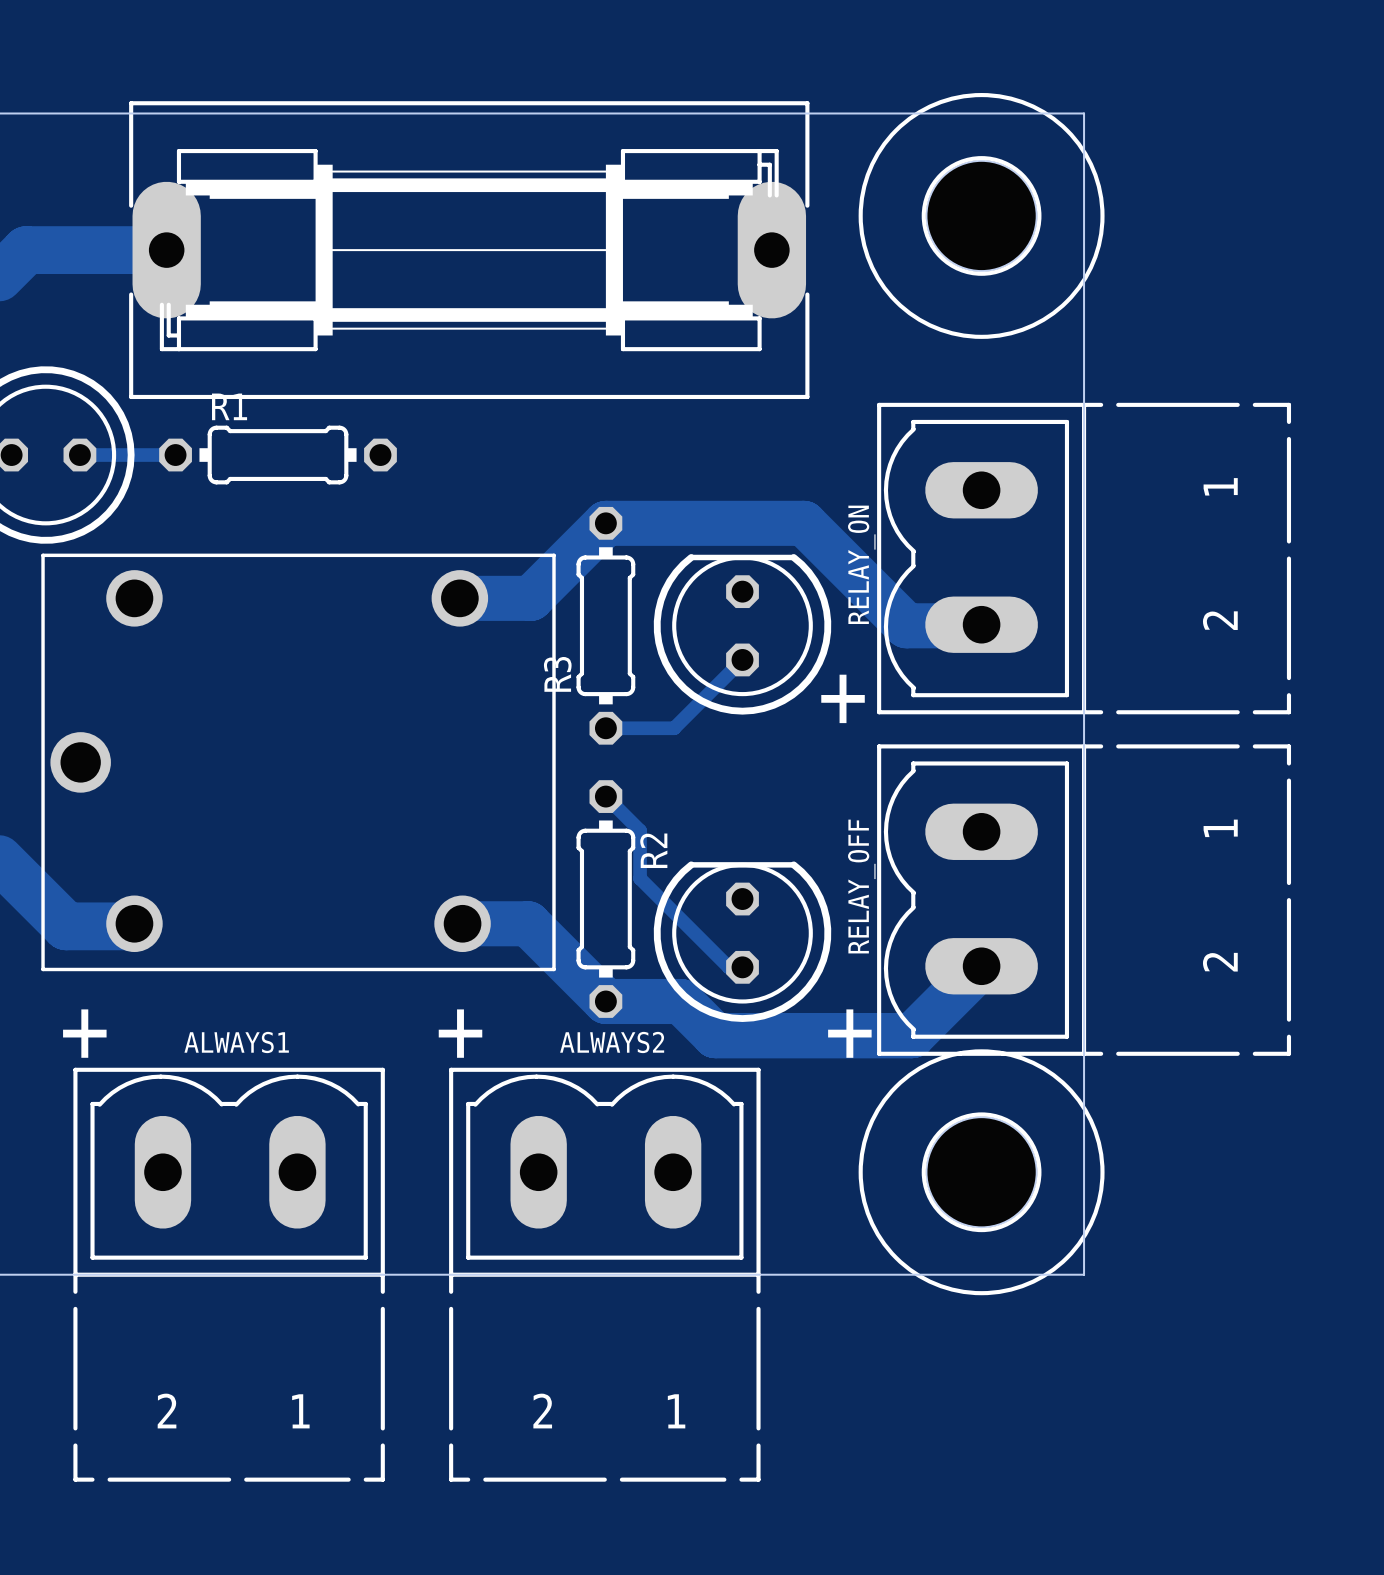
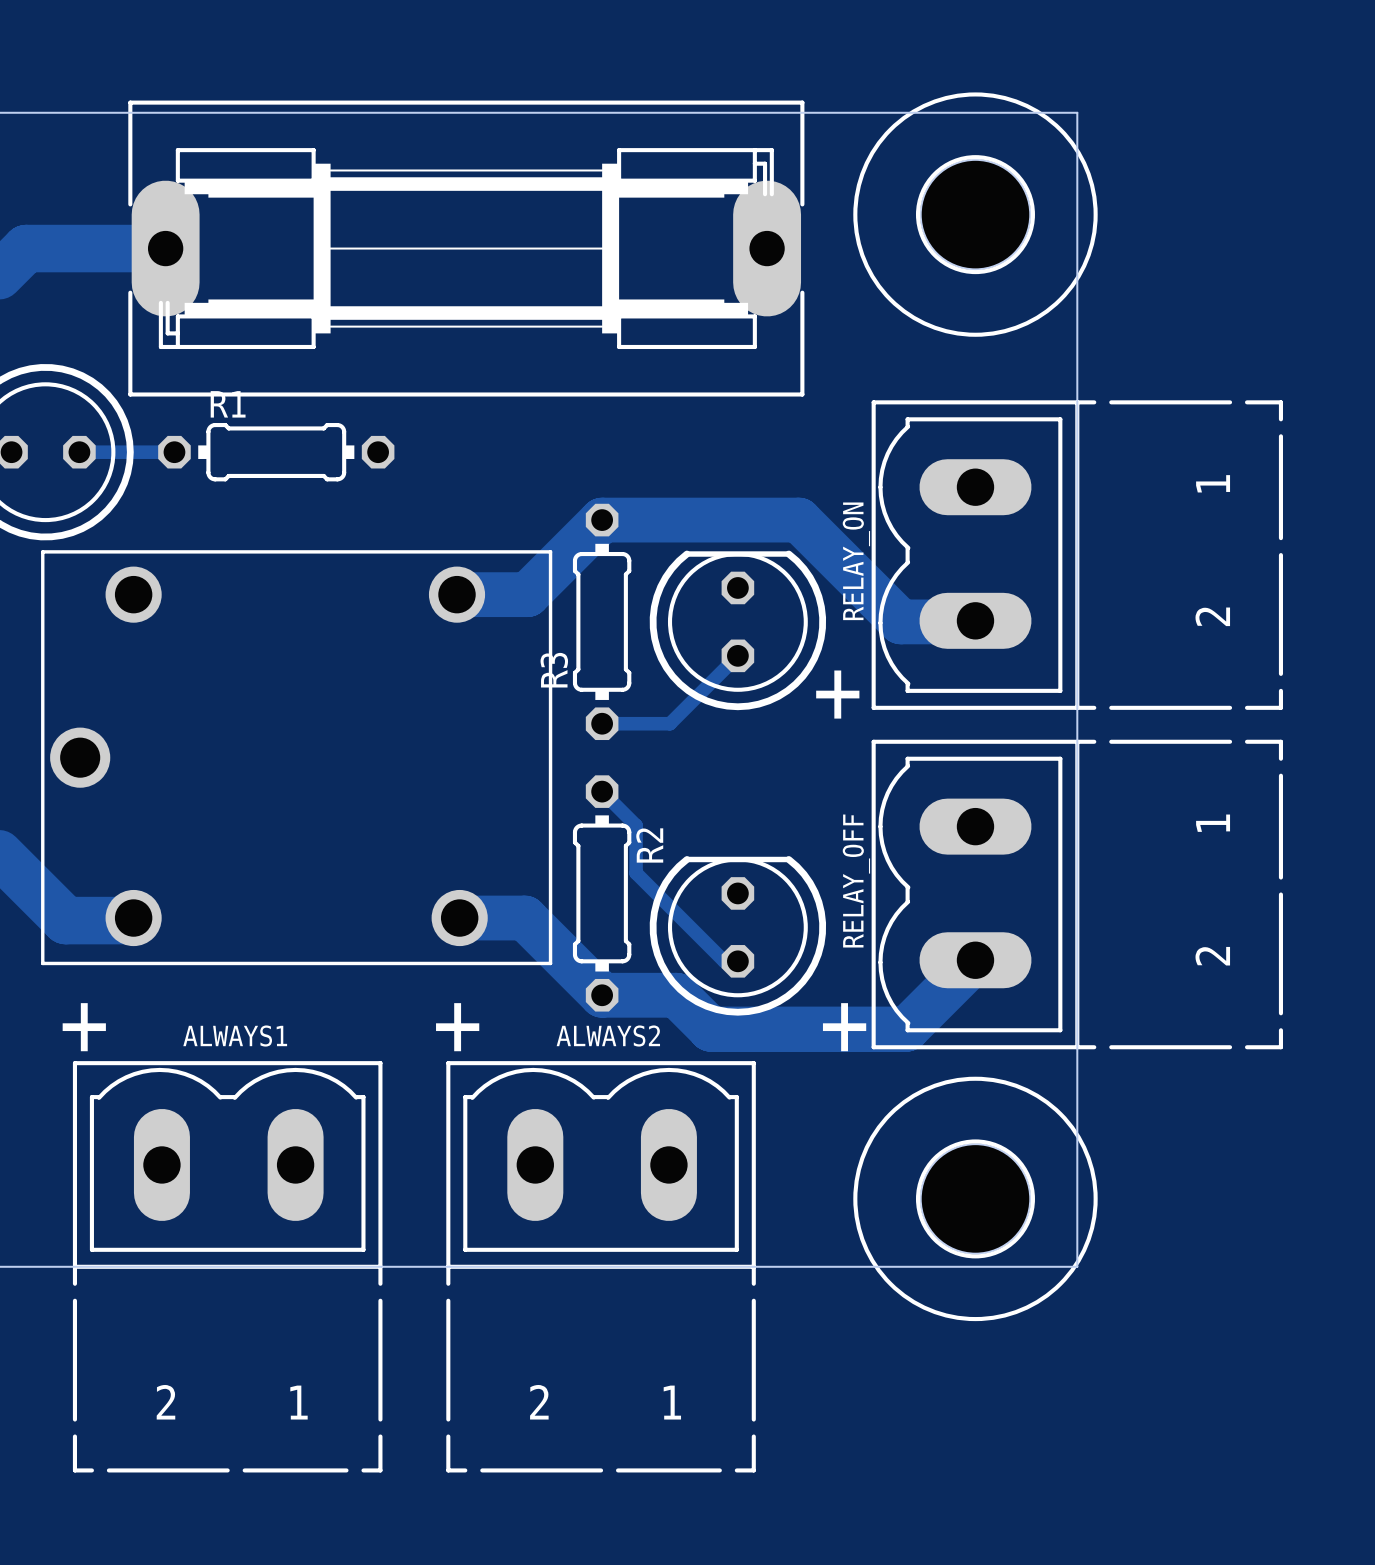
part position: (981, 1172) -> (975, 1198)

